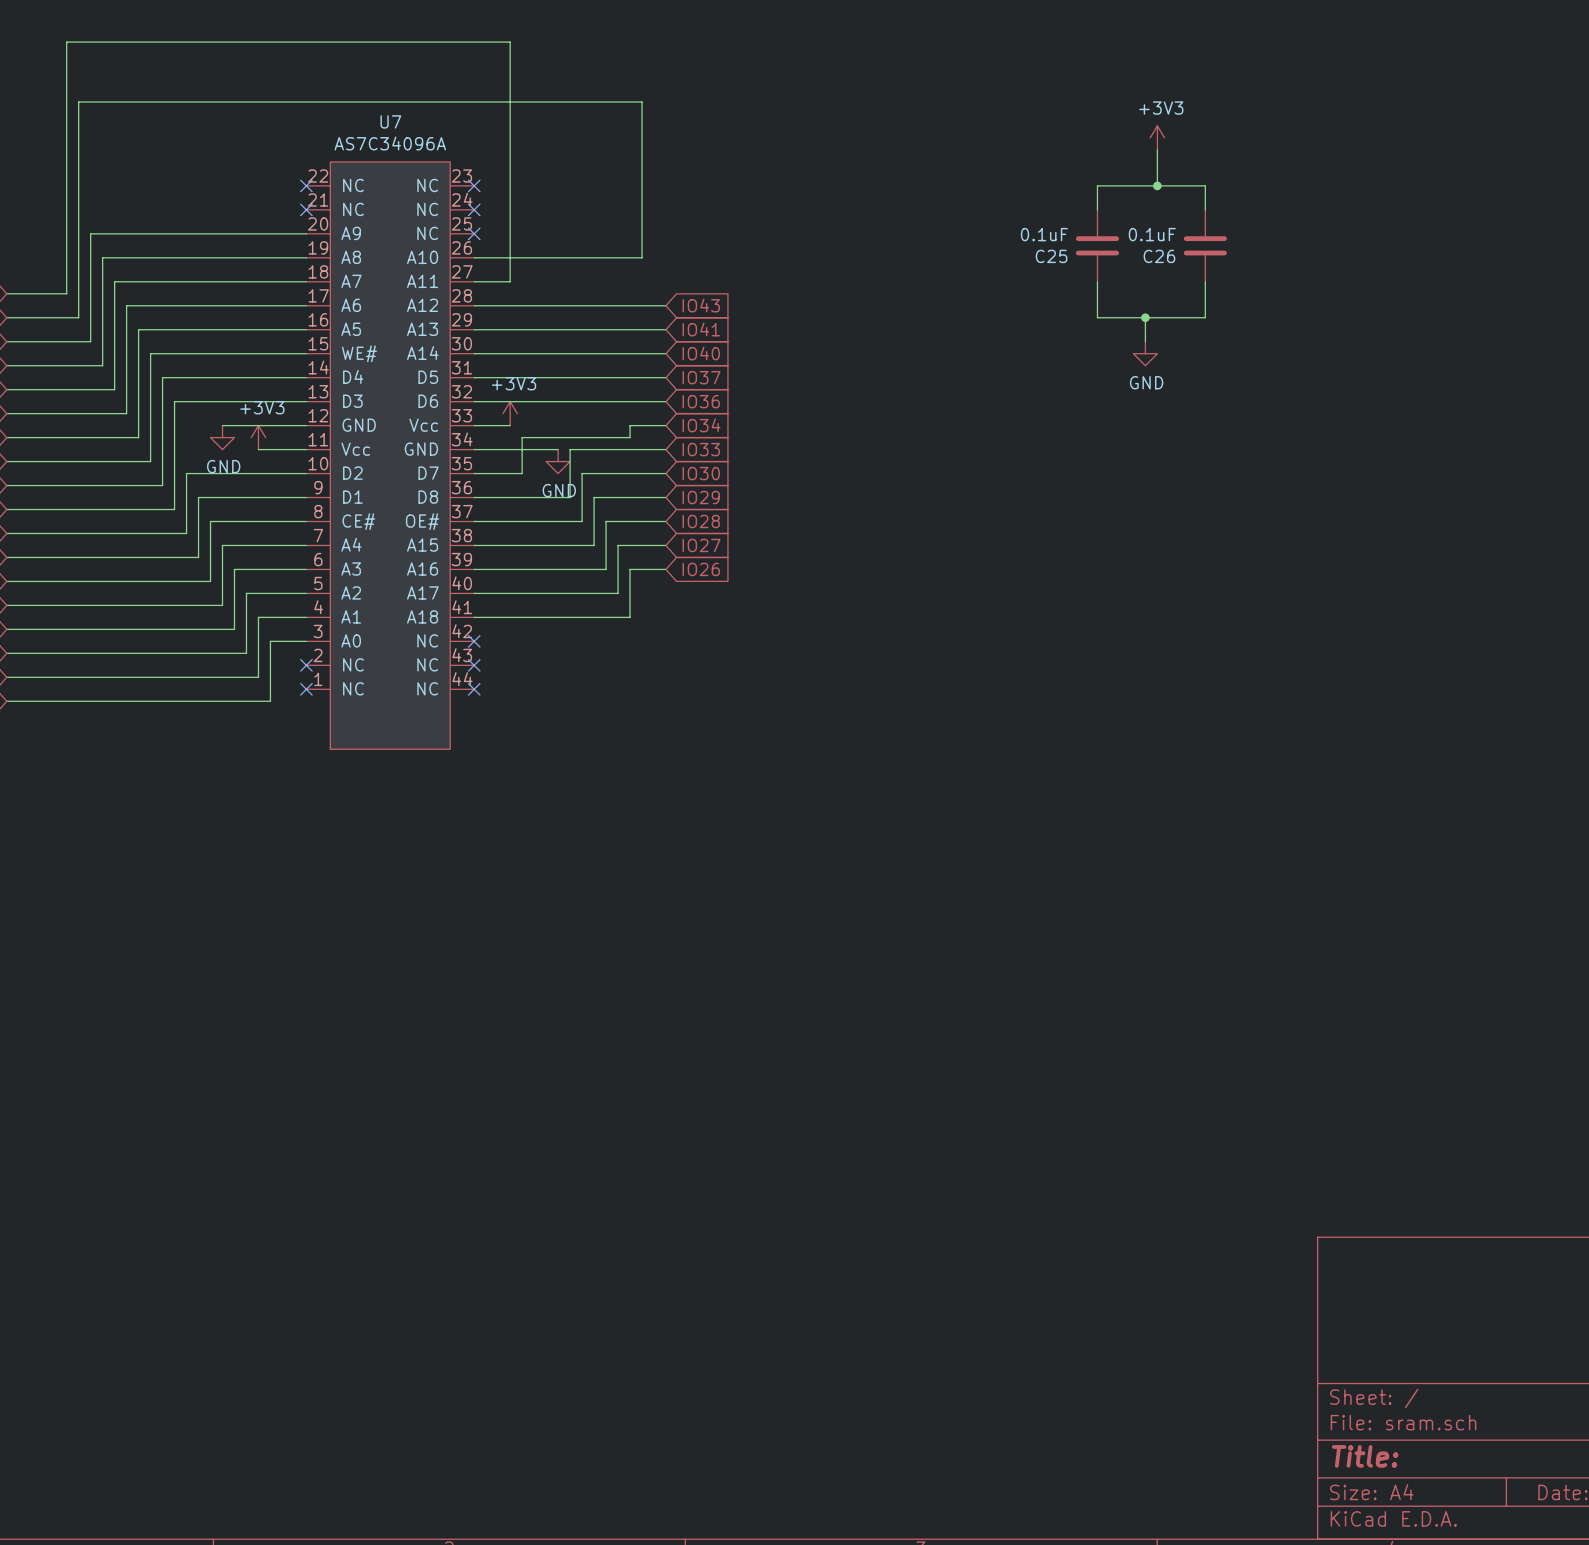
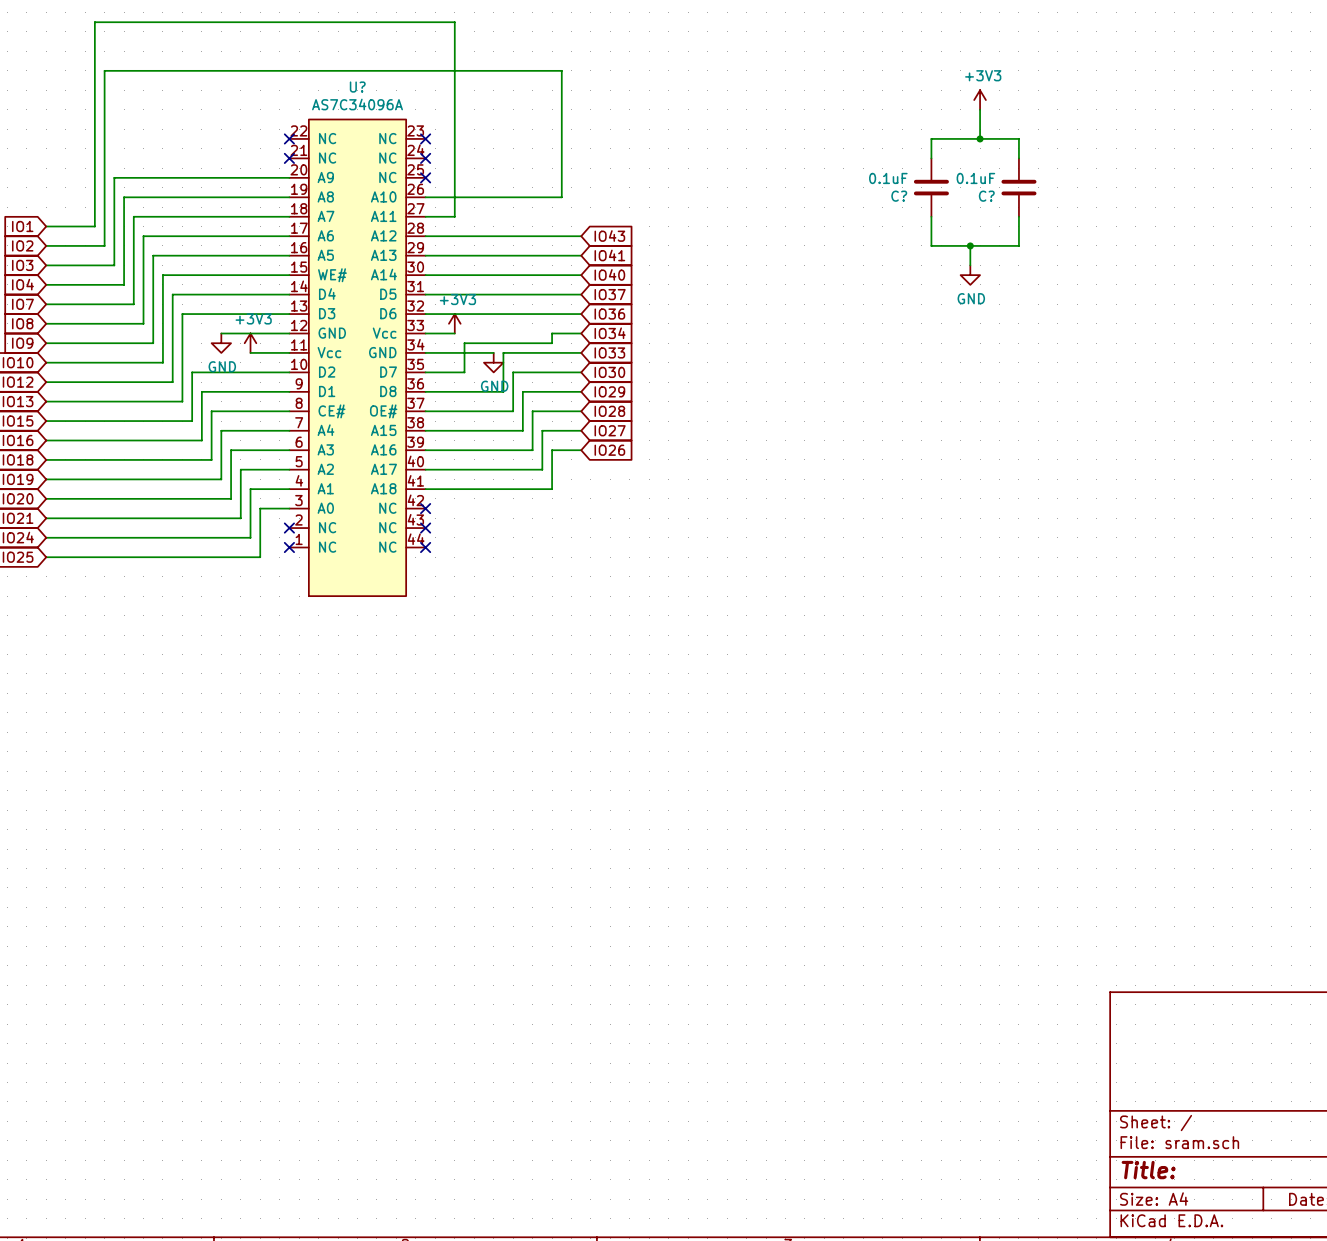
U7 name: U7 (390, 121) -> U? (357, 87)
C25 name: C25 (1051, 256) -> C? (899, 196)
C26 name: C26 (1159, 256) -> C? (986, 196)

